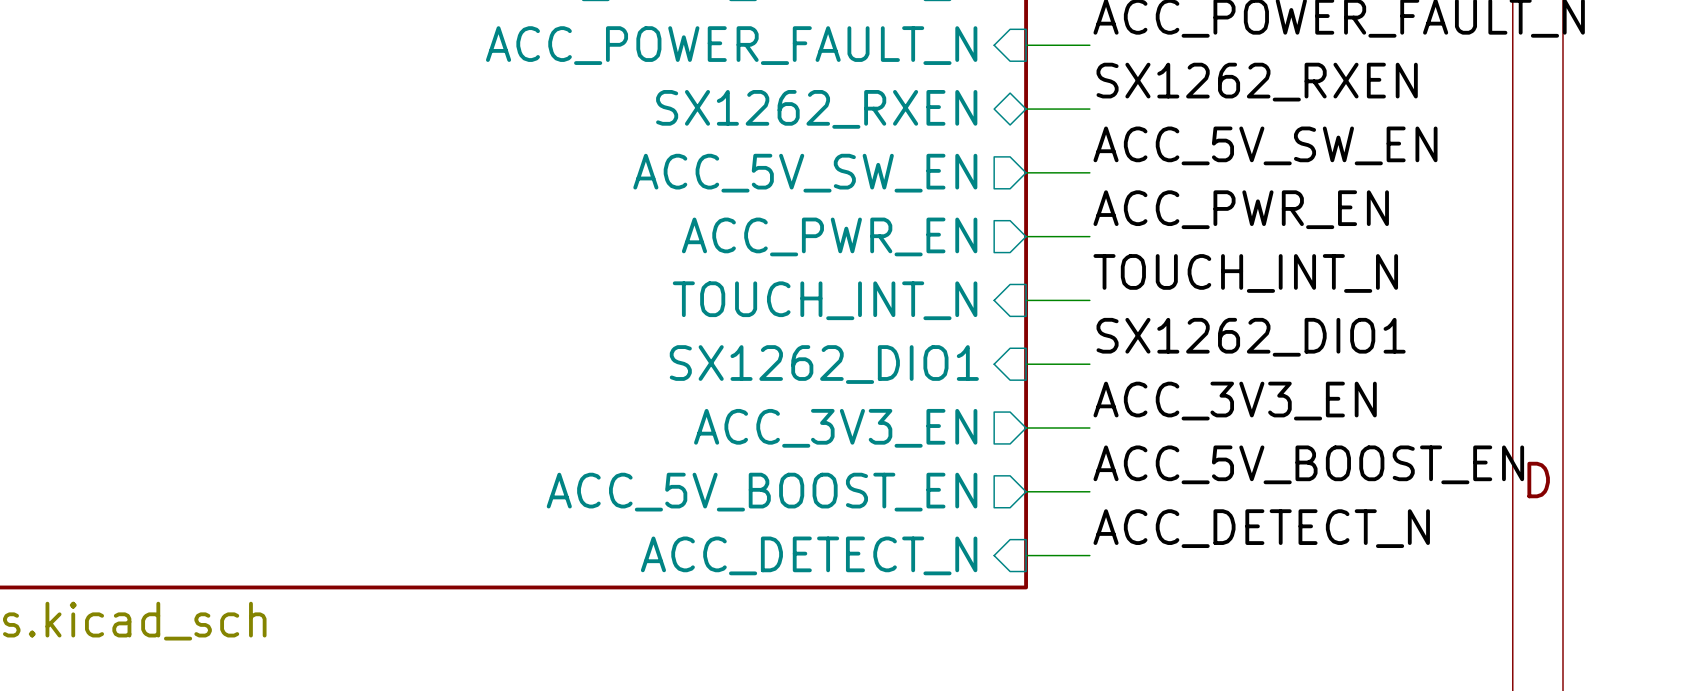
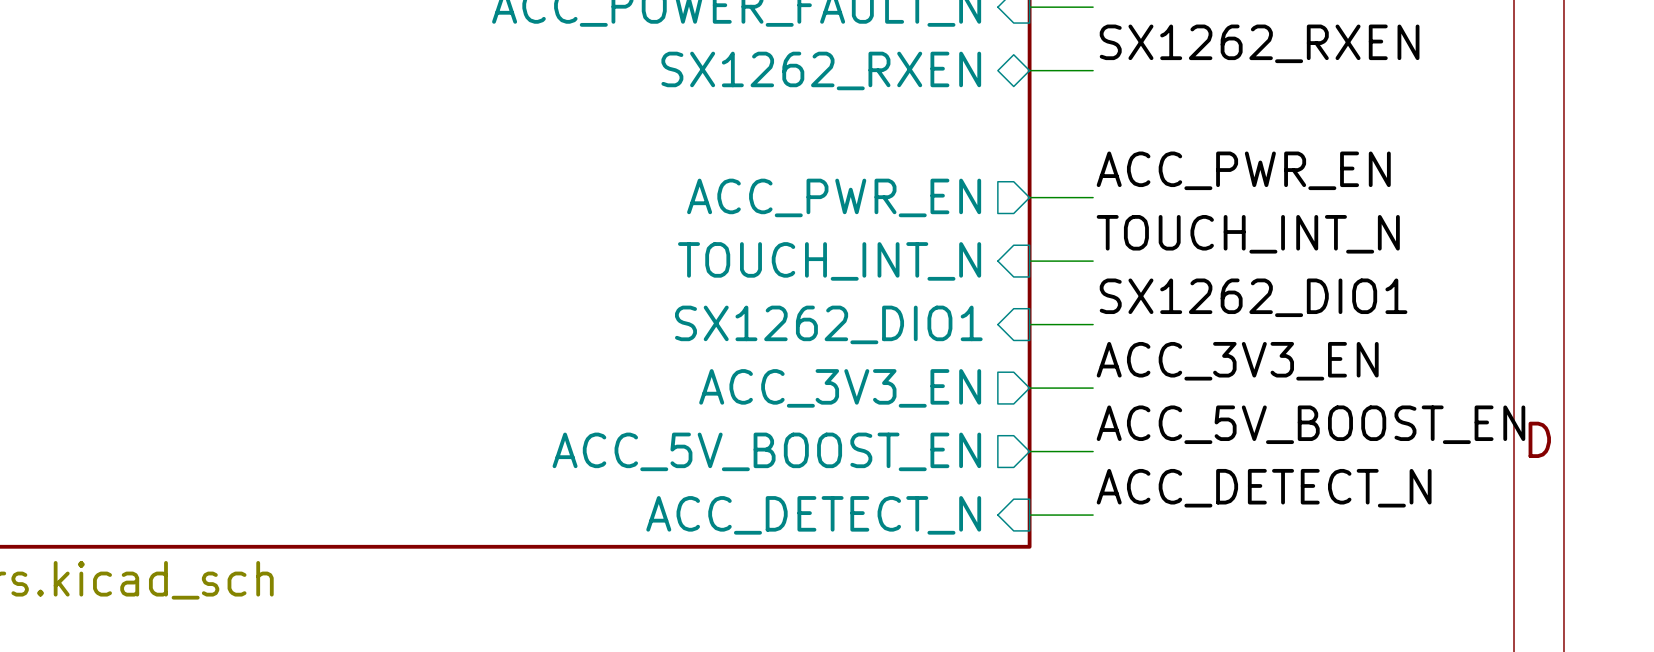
label: ACC_5V_SW_EN (1265, 145) -> none
wire: (1026, 172) (1089, 172) -> none
sheet pin: ACC_5V_SW_EN (805, 173) -> none

